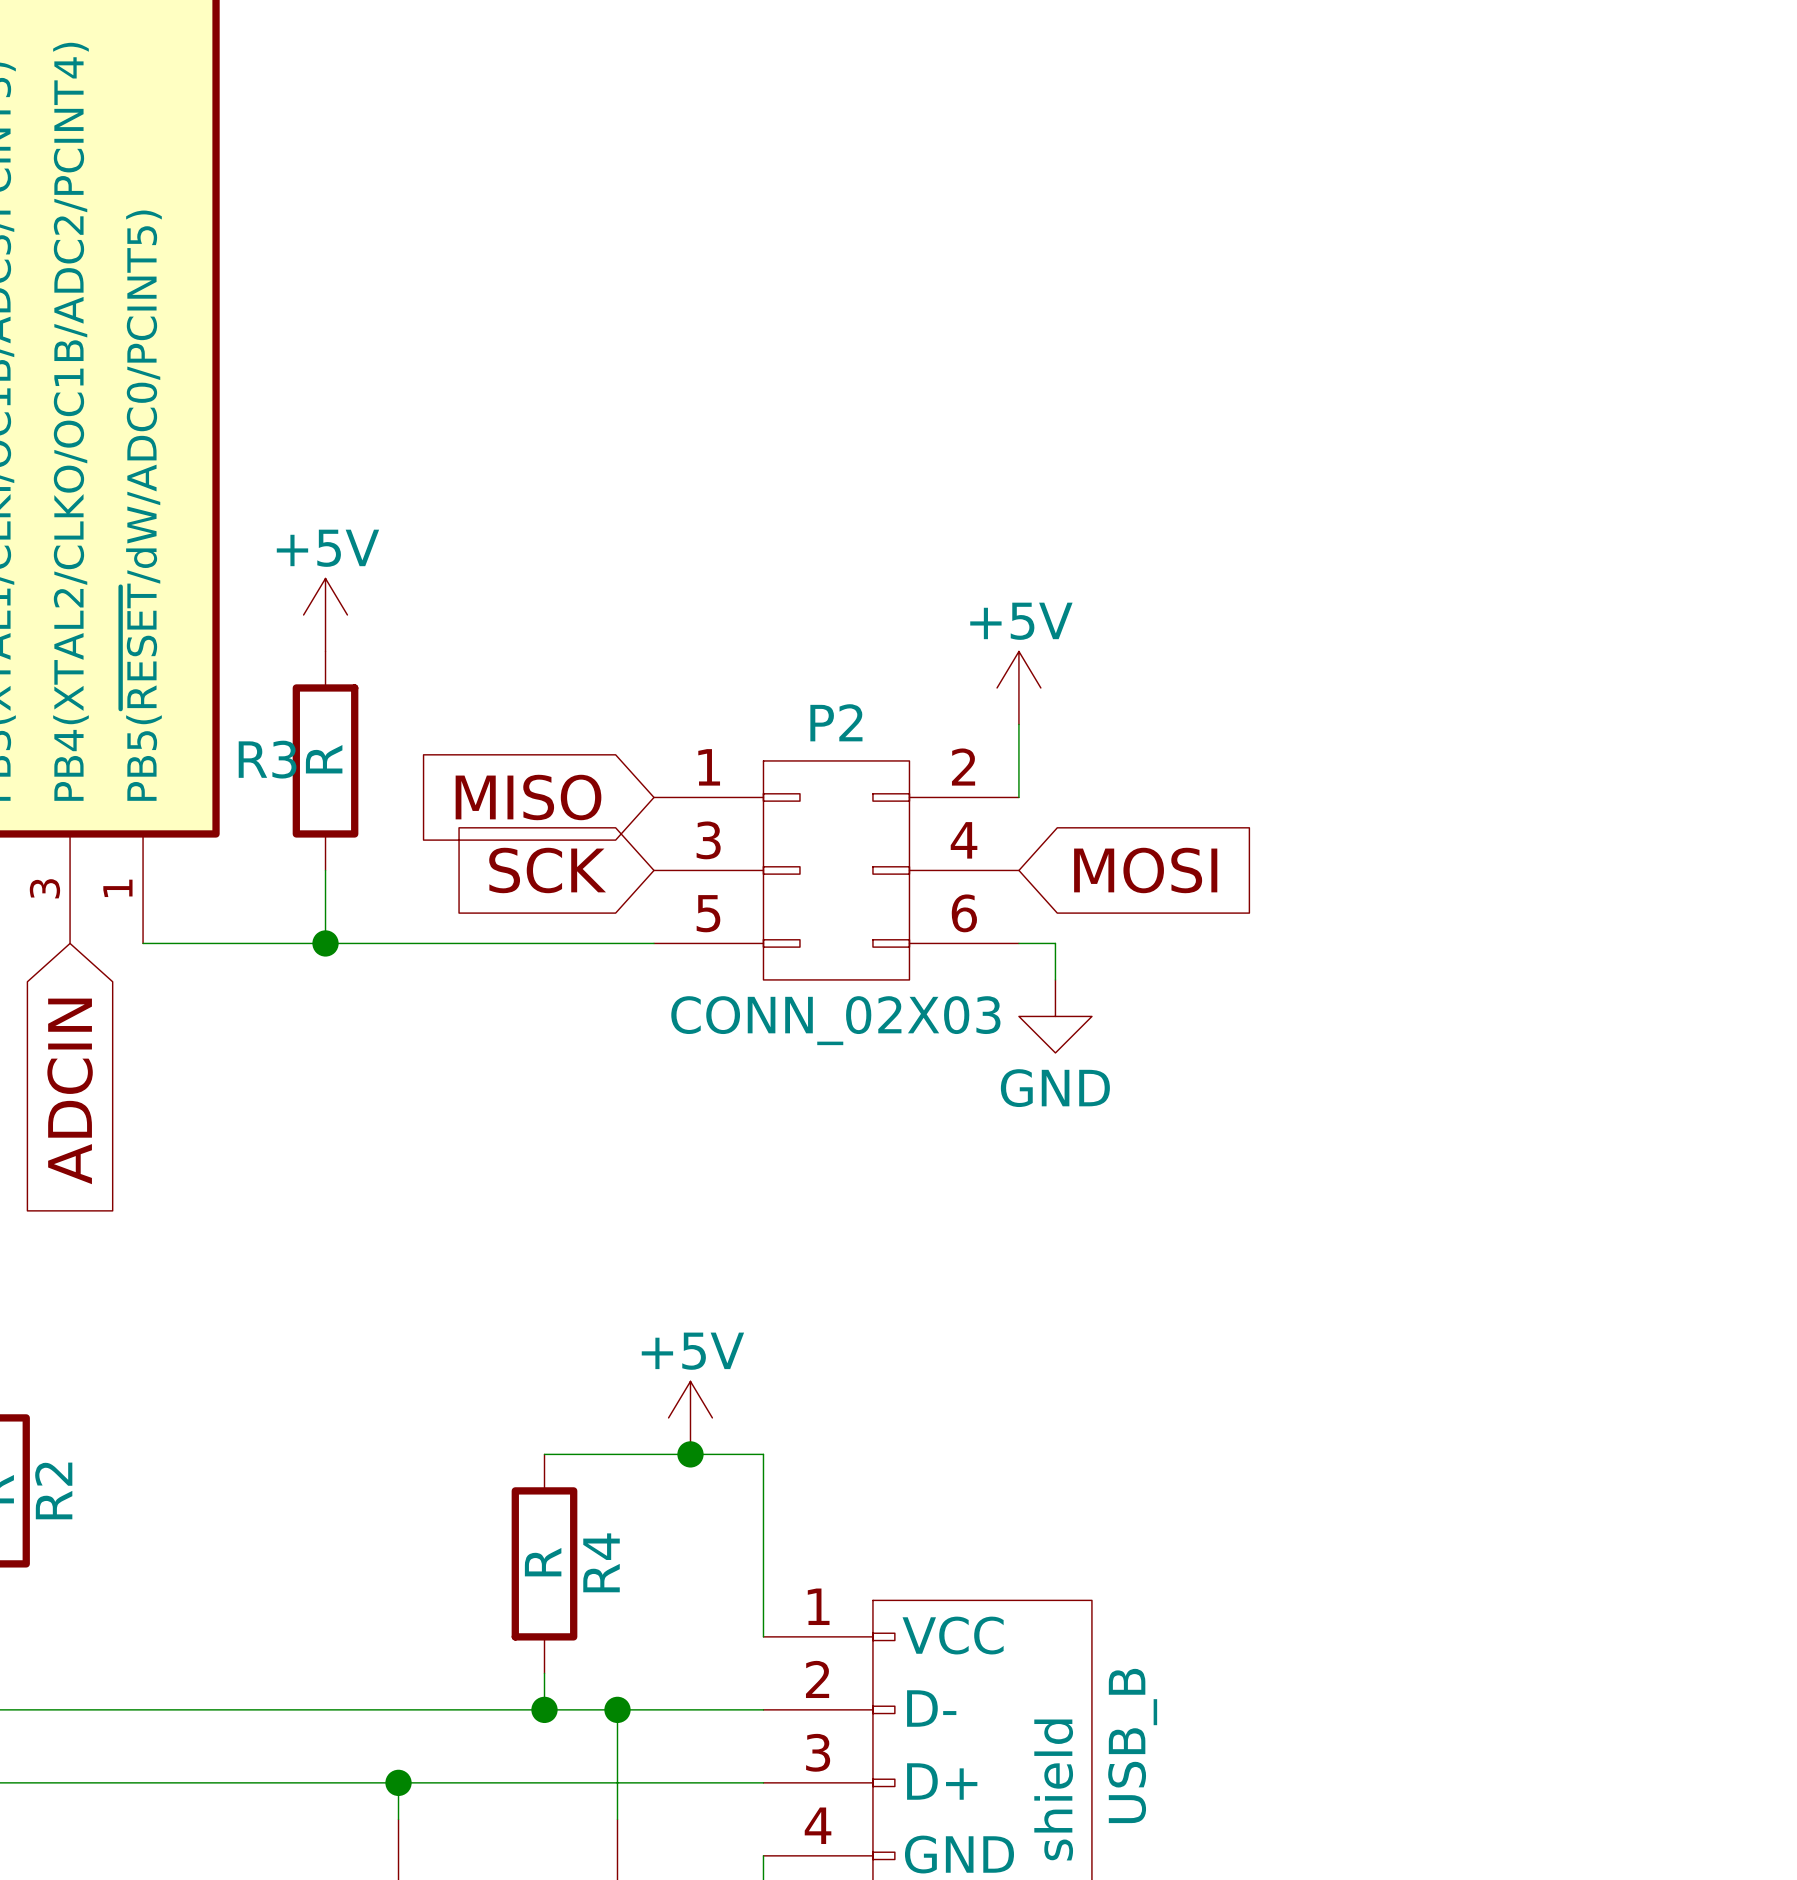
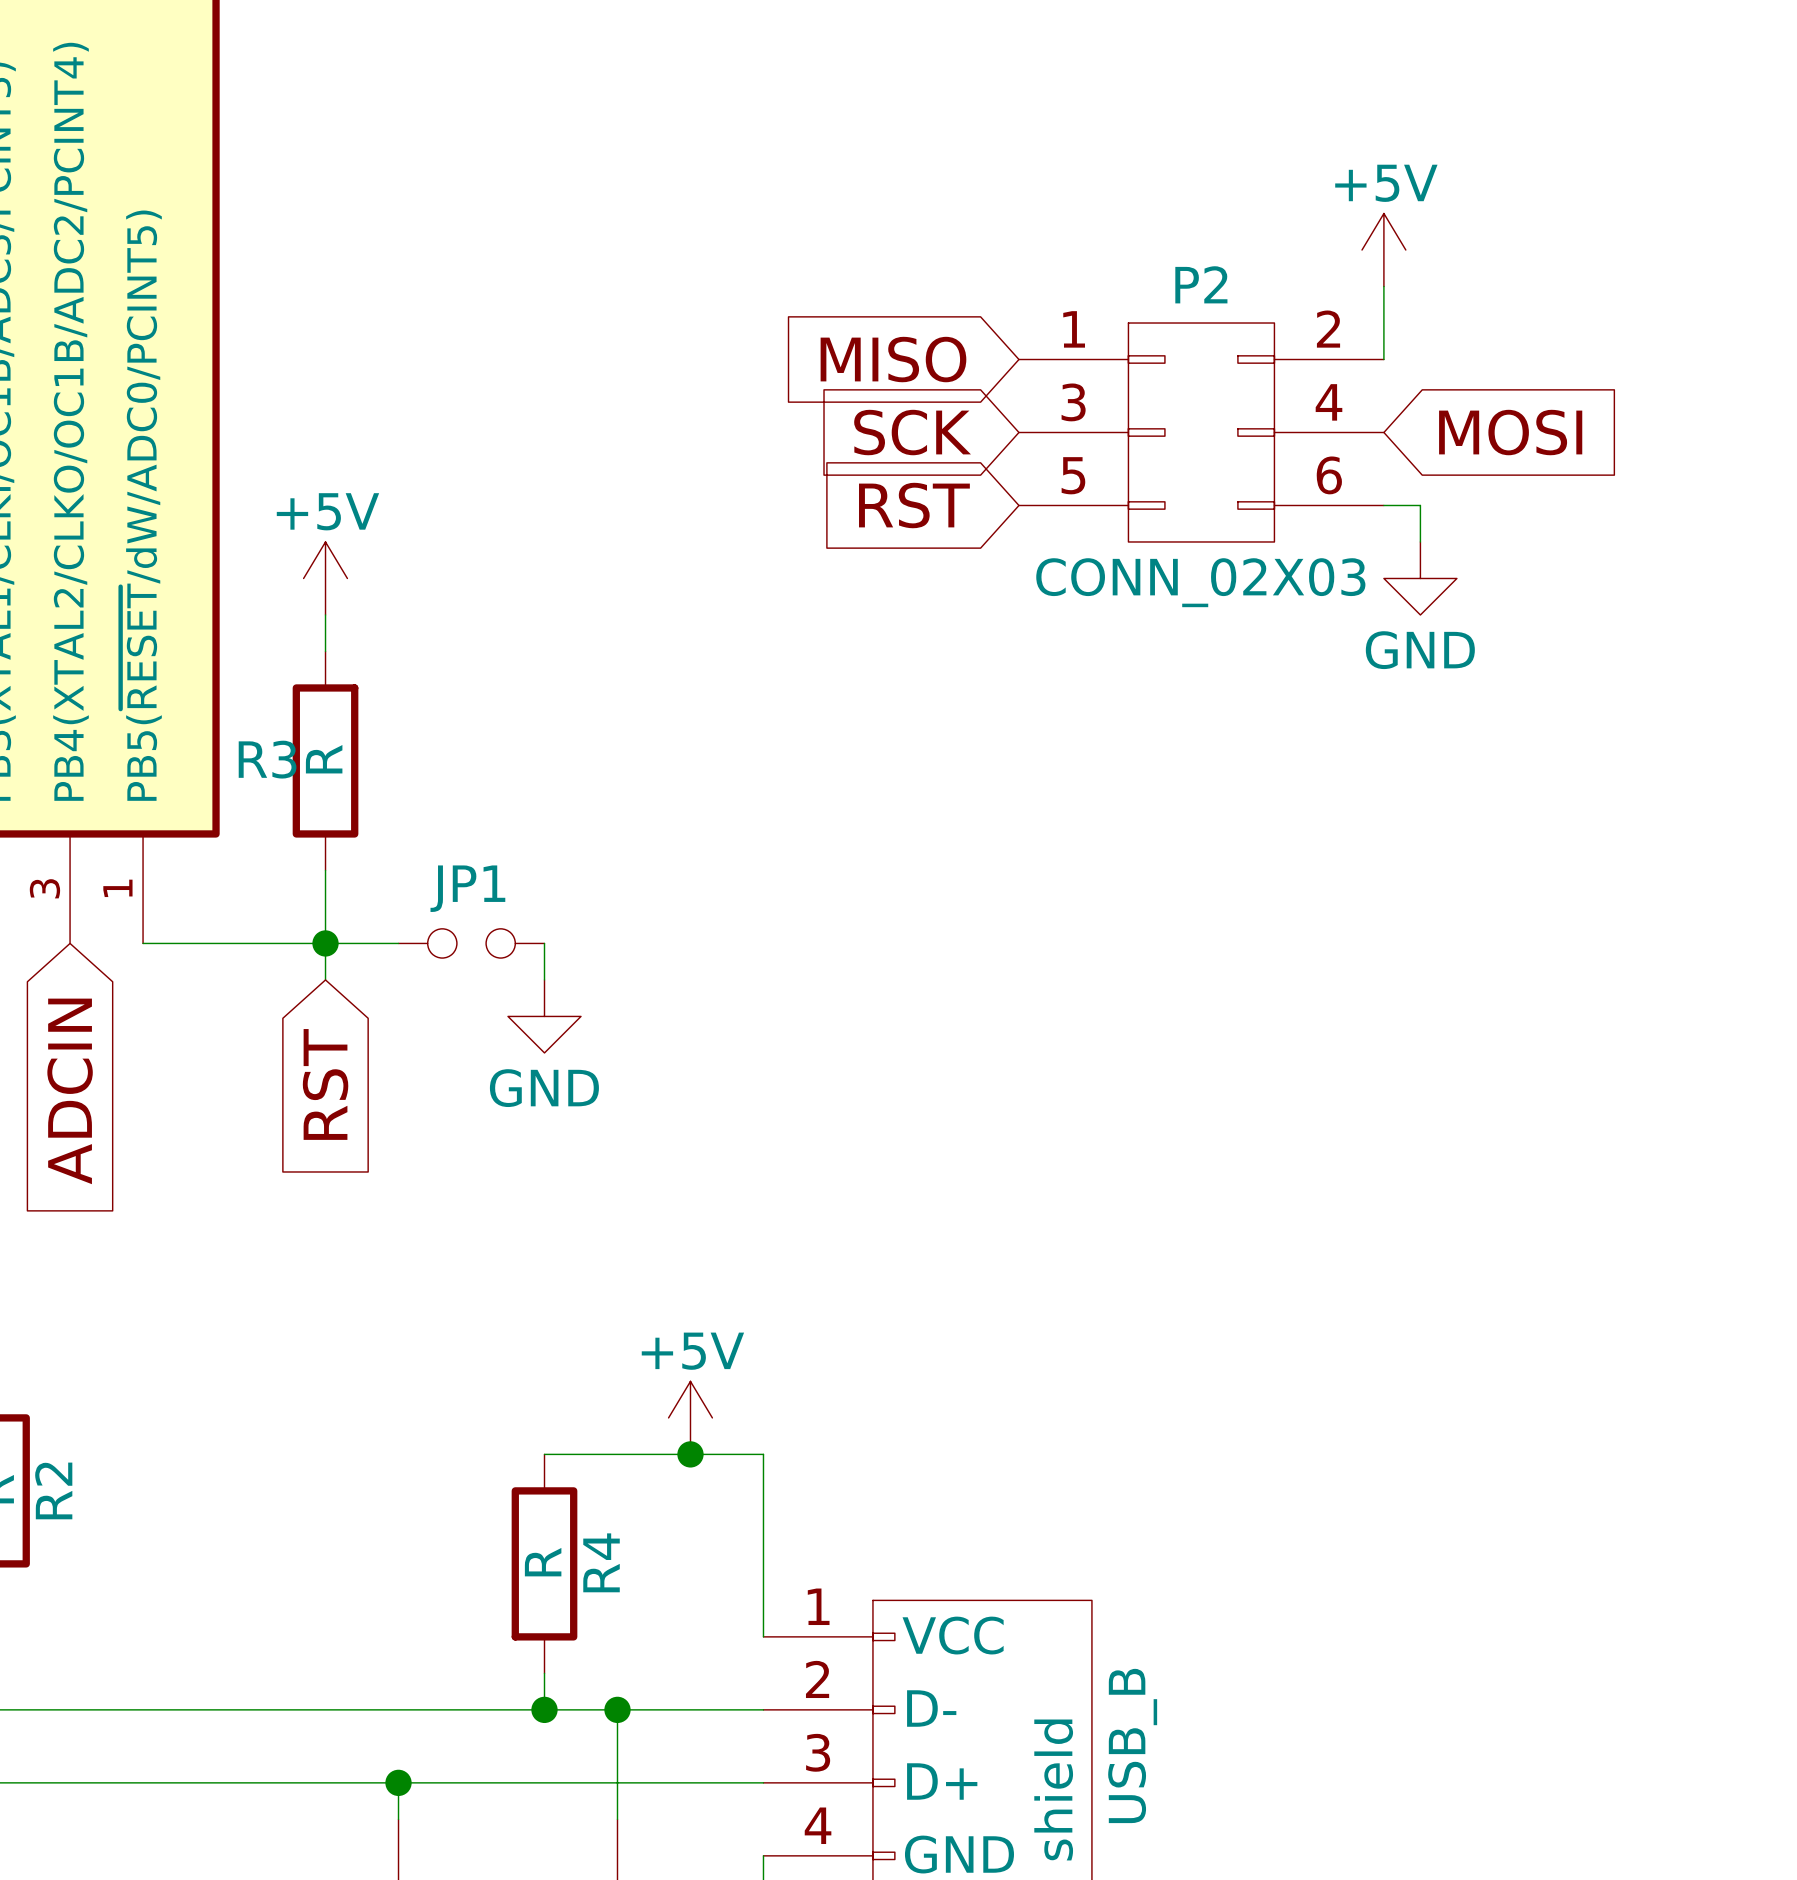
power symbol: none -> +5V (1383, 250)
global label: none -> RST (914, 505)
power symbol: none -> GND (1420, 578)
power symbol position: +5V (325, 614) -> +5V (325, 578)
power symbol: +5V (1018, 687) -> none
wire: (1018, 724) (1018, 797) -> (1383, 286) (1383, 359)
global label position: MISO (528, 797) -> MISO (893, 359)
global label position: SCK (547, 870) -> SCK (912, 432)
P2 position: (836, 870) -> (1201, 432)
global label position: MOSI (1145, 870) -> MOSI (1510, 432)
wire: none -> (325, 943) (325, 979)
wire: (398, 943) (653, 943) -> none
JP1: none -> (471, 943)
wire: none -> (544, 943) (544, 979)
wire: (1018, 943) (1055, 943) (1055, 979) -> (1383, 505) (1420, 505) (1420, 541)
power symbol: none -> GND (544, 1016)
power symbol: GND (1055, 1016) -> none
global label: none -> RST (325, 1084)

